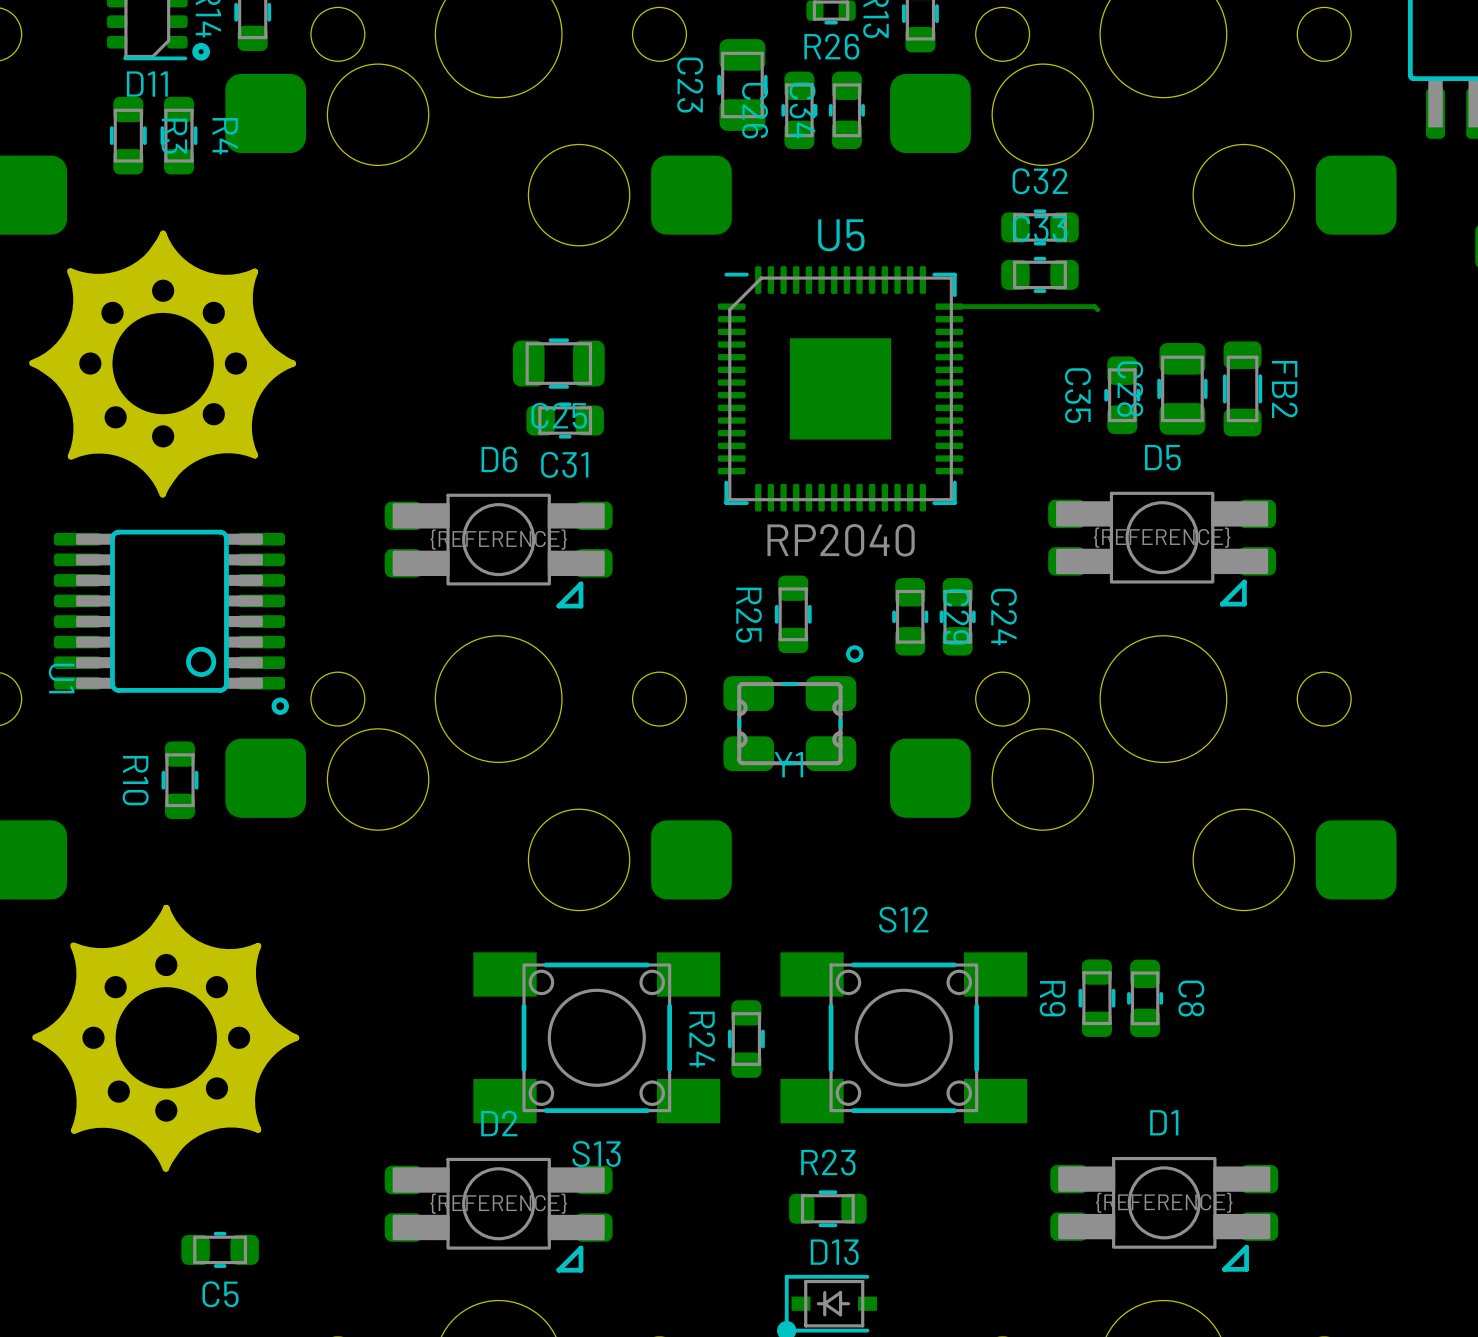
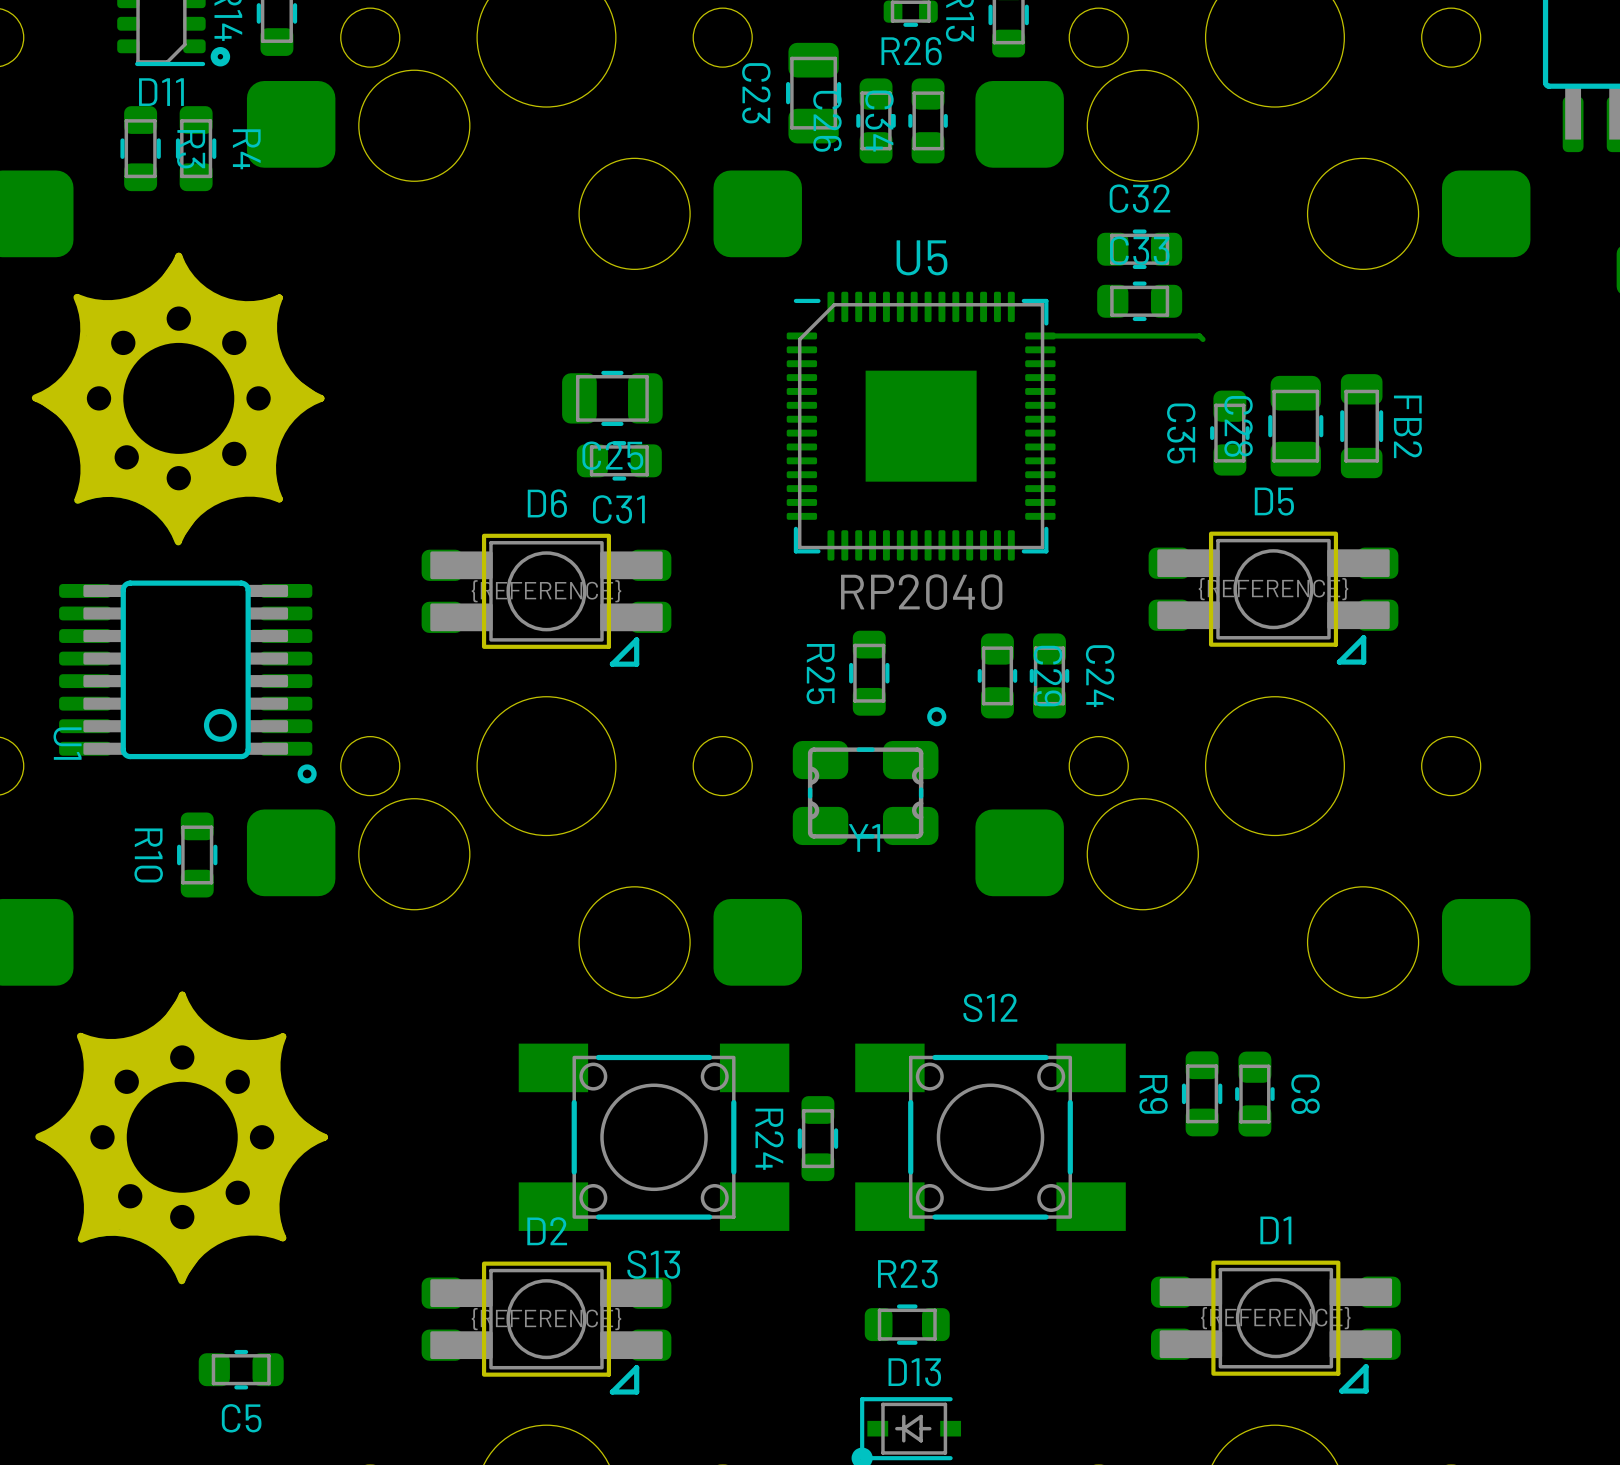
D5 footprint: [1048, 491, 1277, 607] -> [1148, 531, 1399, 665]
D6 footprint: [384, 493, 613, 609] -> [421, 533, 672, 667]
D1 footprint: [1050, 1156, 1279, 1272] -> [1150, 1260, 1401, 1394]
D2 footprint: [384, 1157, 613, 1273] -> [421, 1261, 672, 1395]

